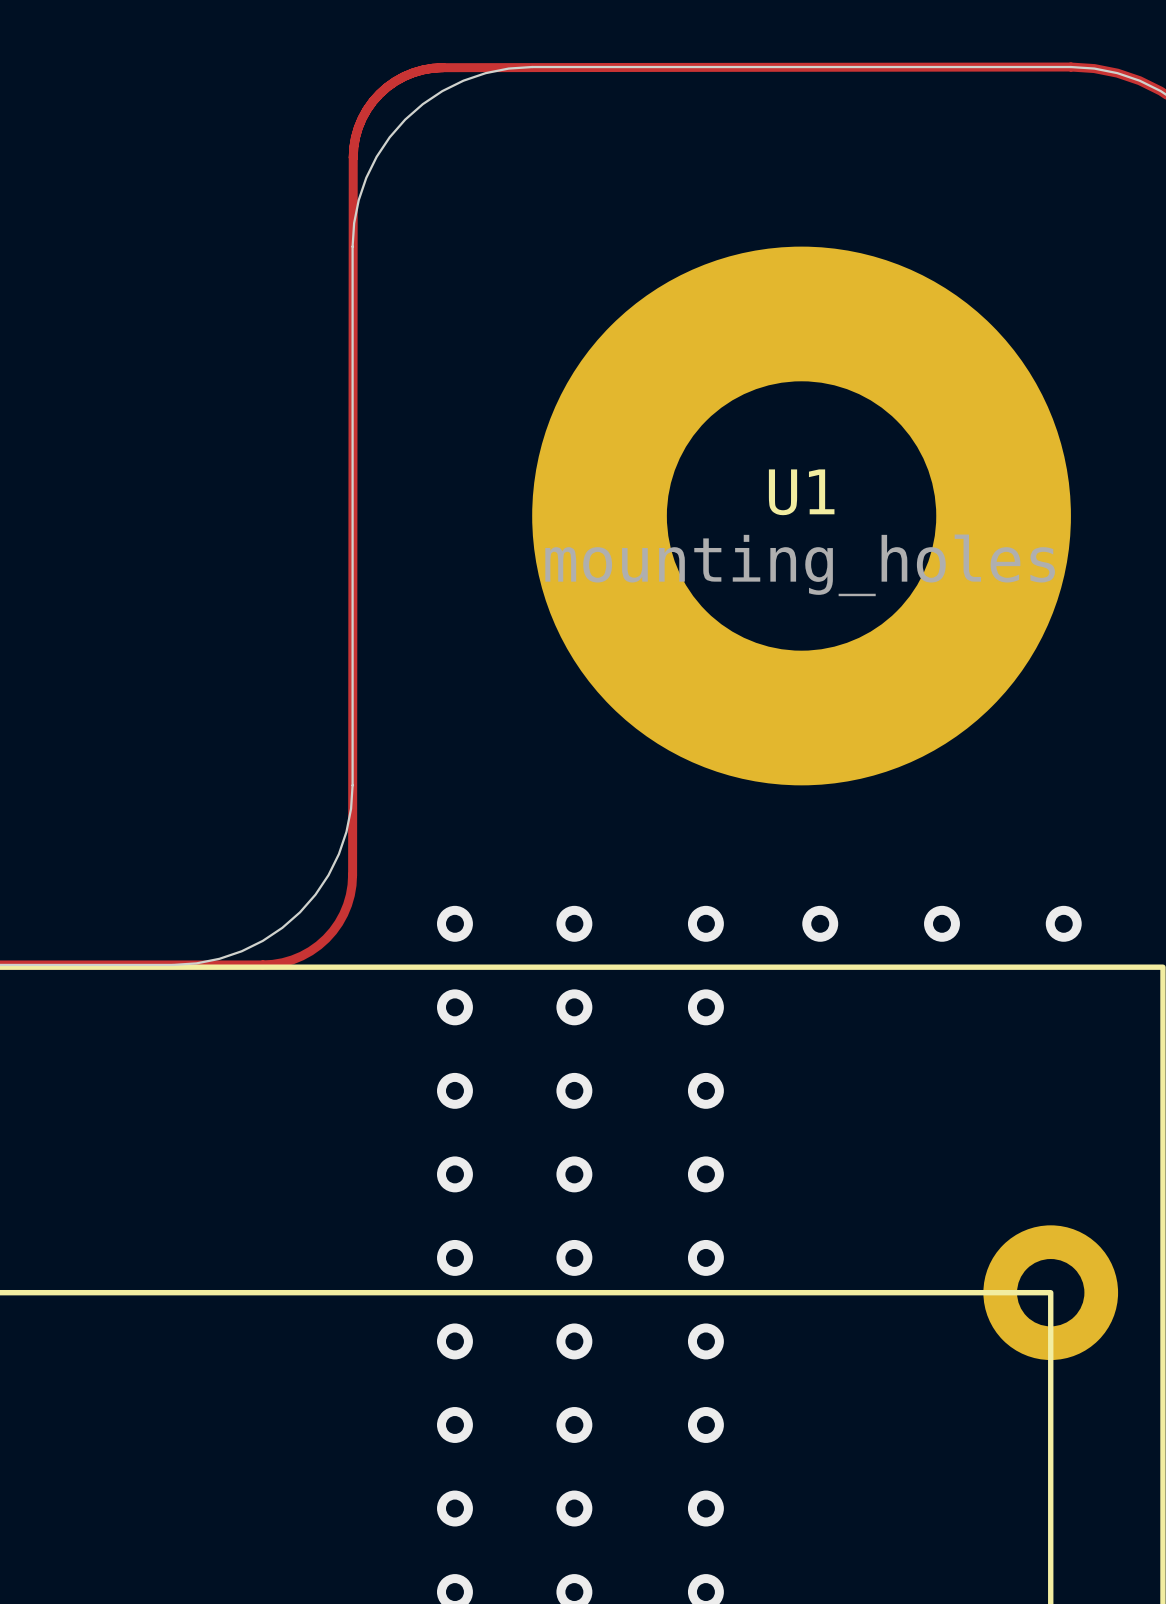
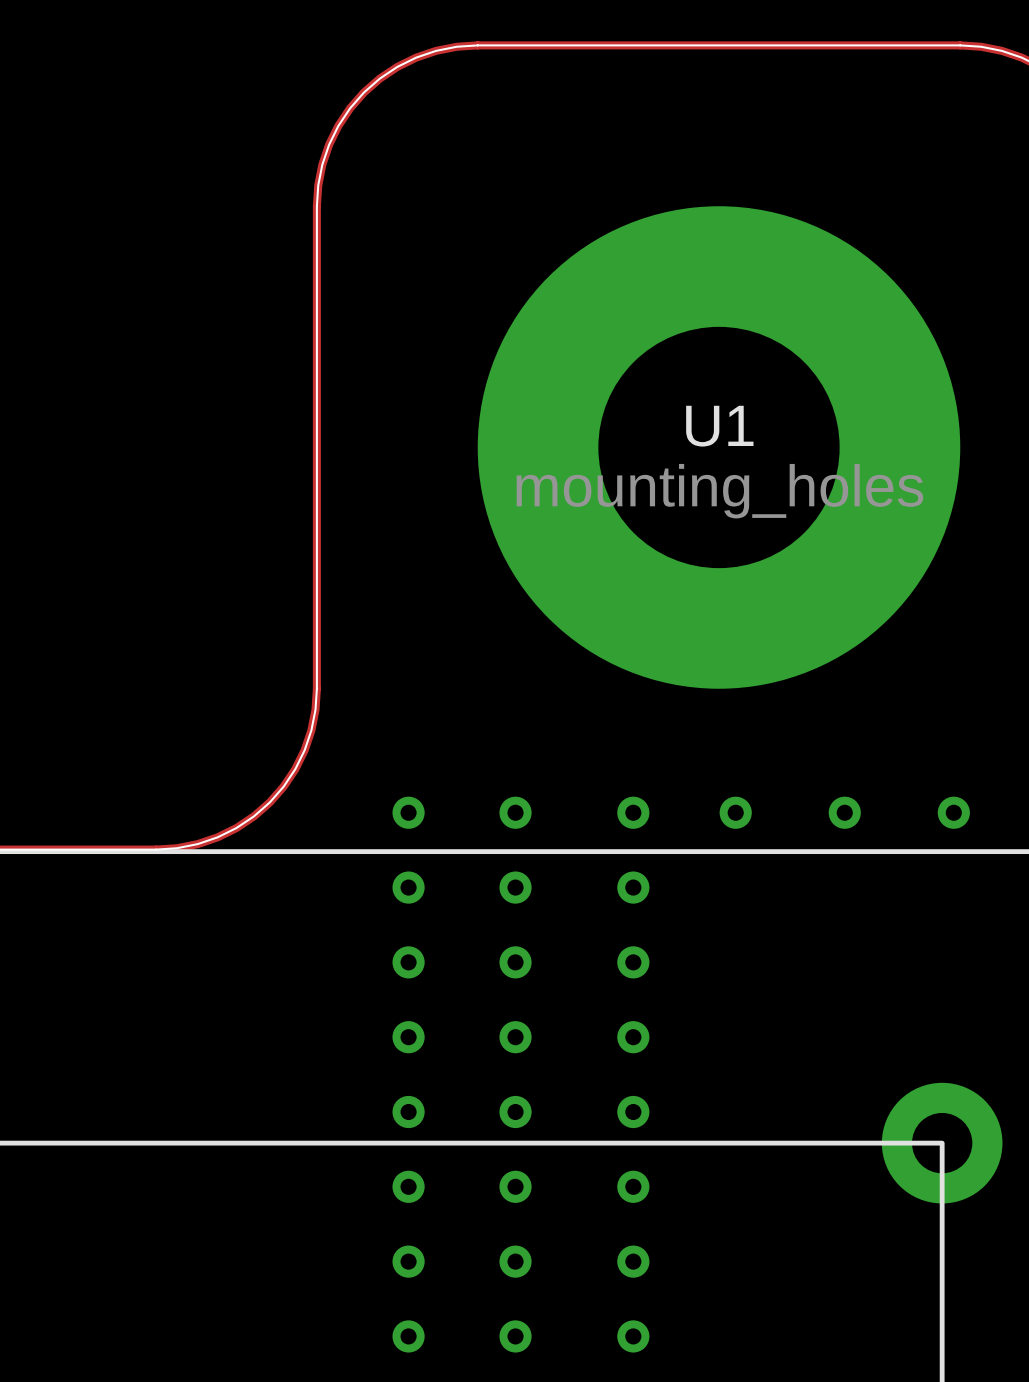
top track: (443, 67) (423, 69) (404, 76) (379, 93) (362, 118) (355, 137) (353, 157) -> none
top track: (443, 67) (423, 69) (404, 76) (379, 93) (362, 118) (355, 137) (353, 157) -> none
top track: (1070, 67) (443, 67) -> none
top track: (353, 157) (352, 875) (350, 895) (343, 914) (333, 931) (310, 951) (292, 959) (262, 964) (173, 964) -> (960, 45) (456, 46) (416, 57) (397, 66) (364, 92) (338, 125) (322, 164) (318, 185) (316, 688) (311, 730) (295, 769) (283, 786) (253, 816) (217, 837) (197, 844) (156, 849)

